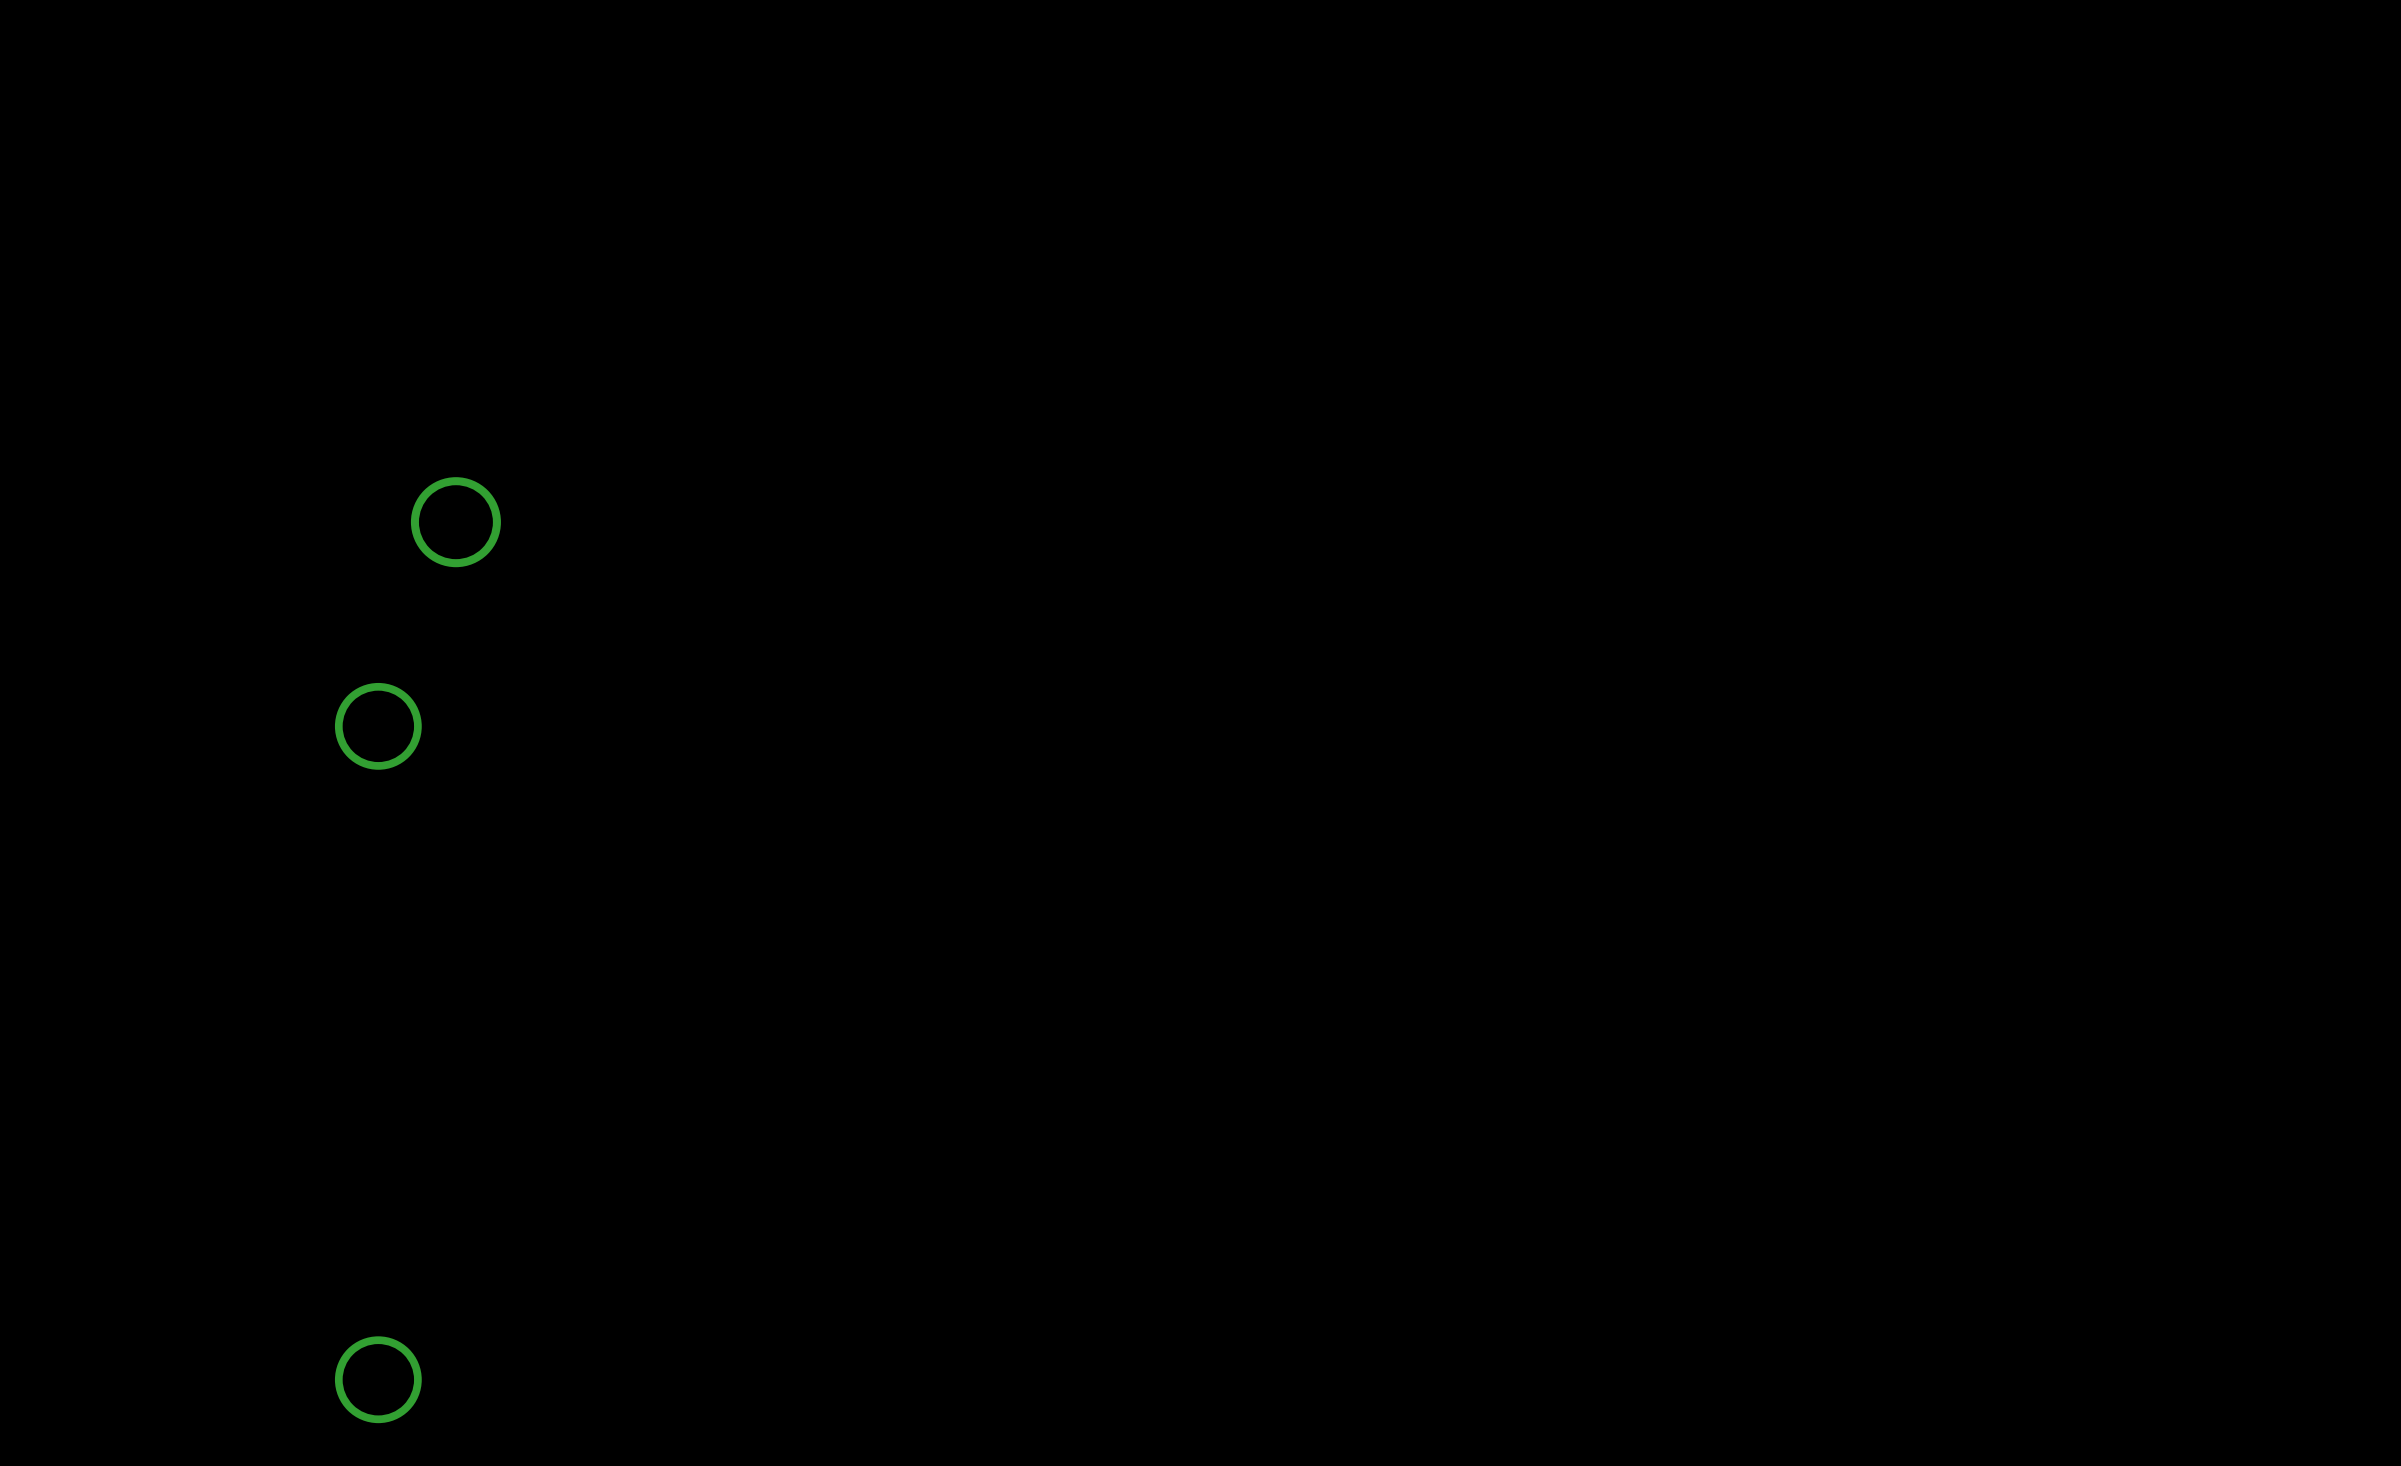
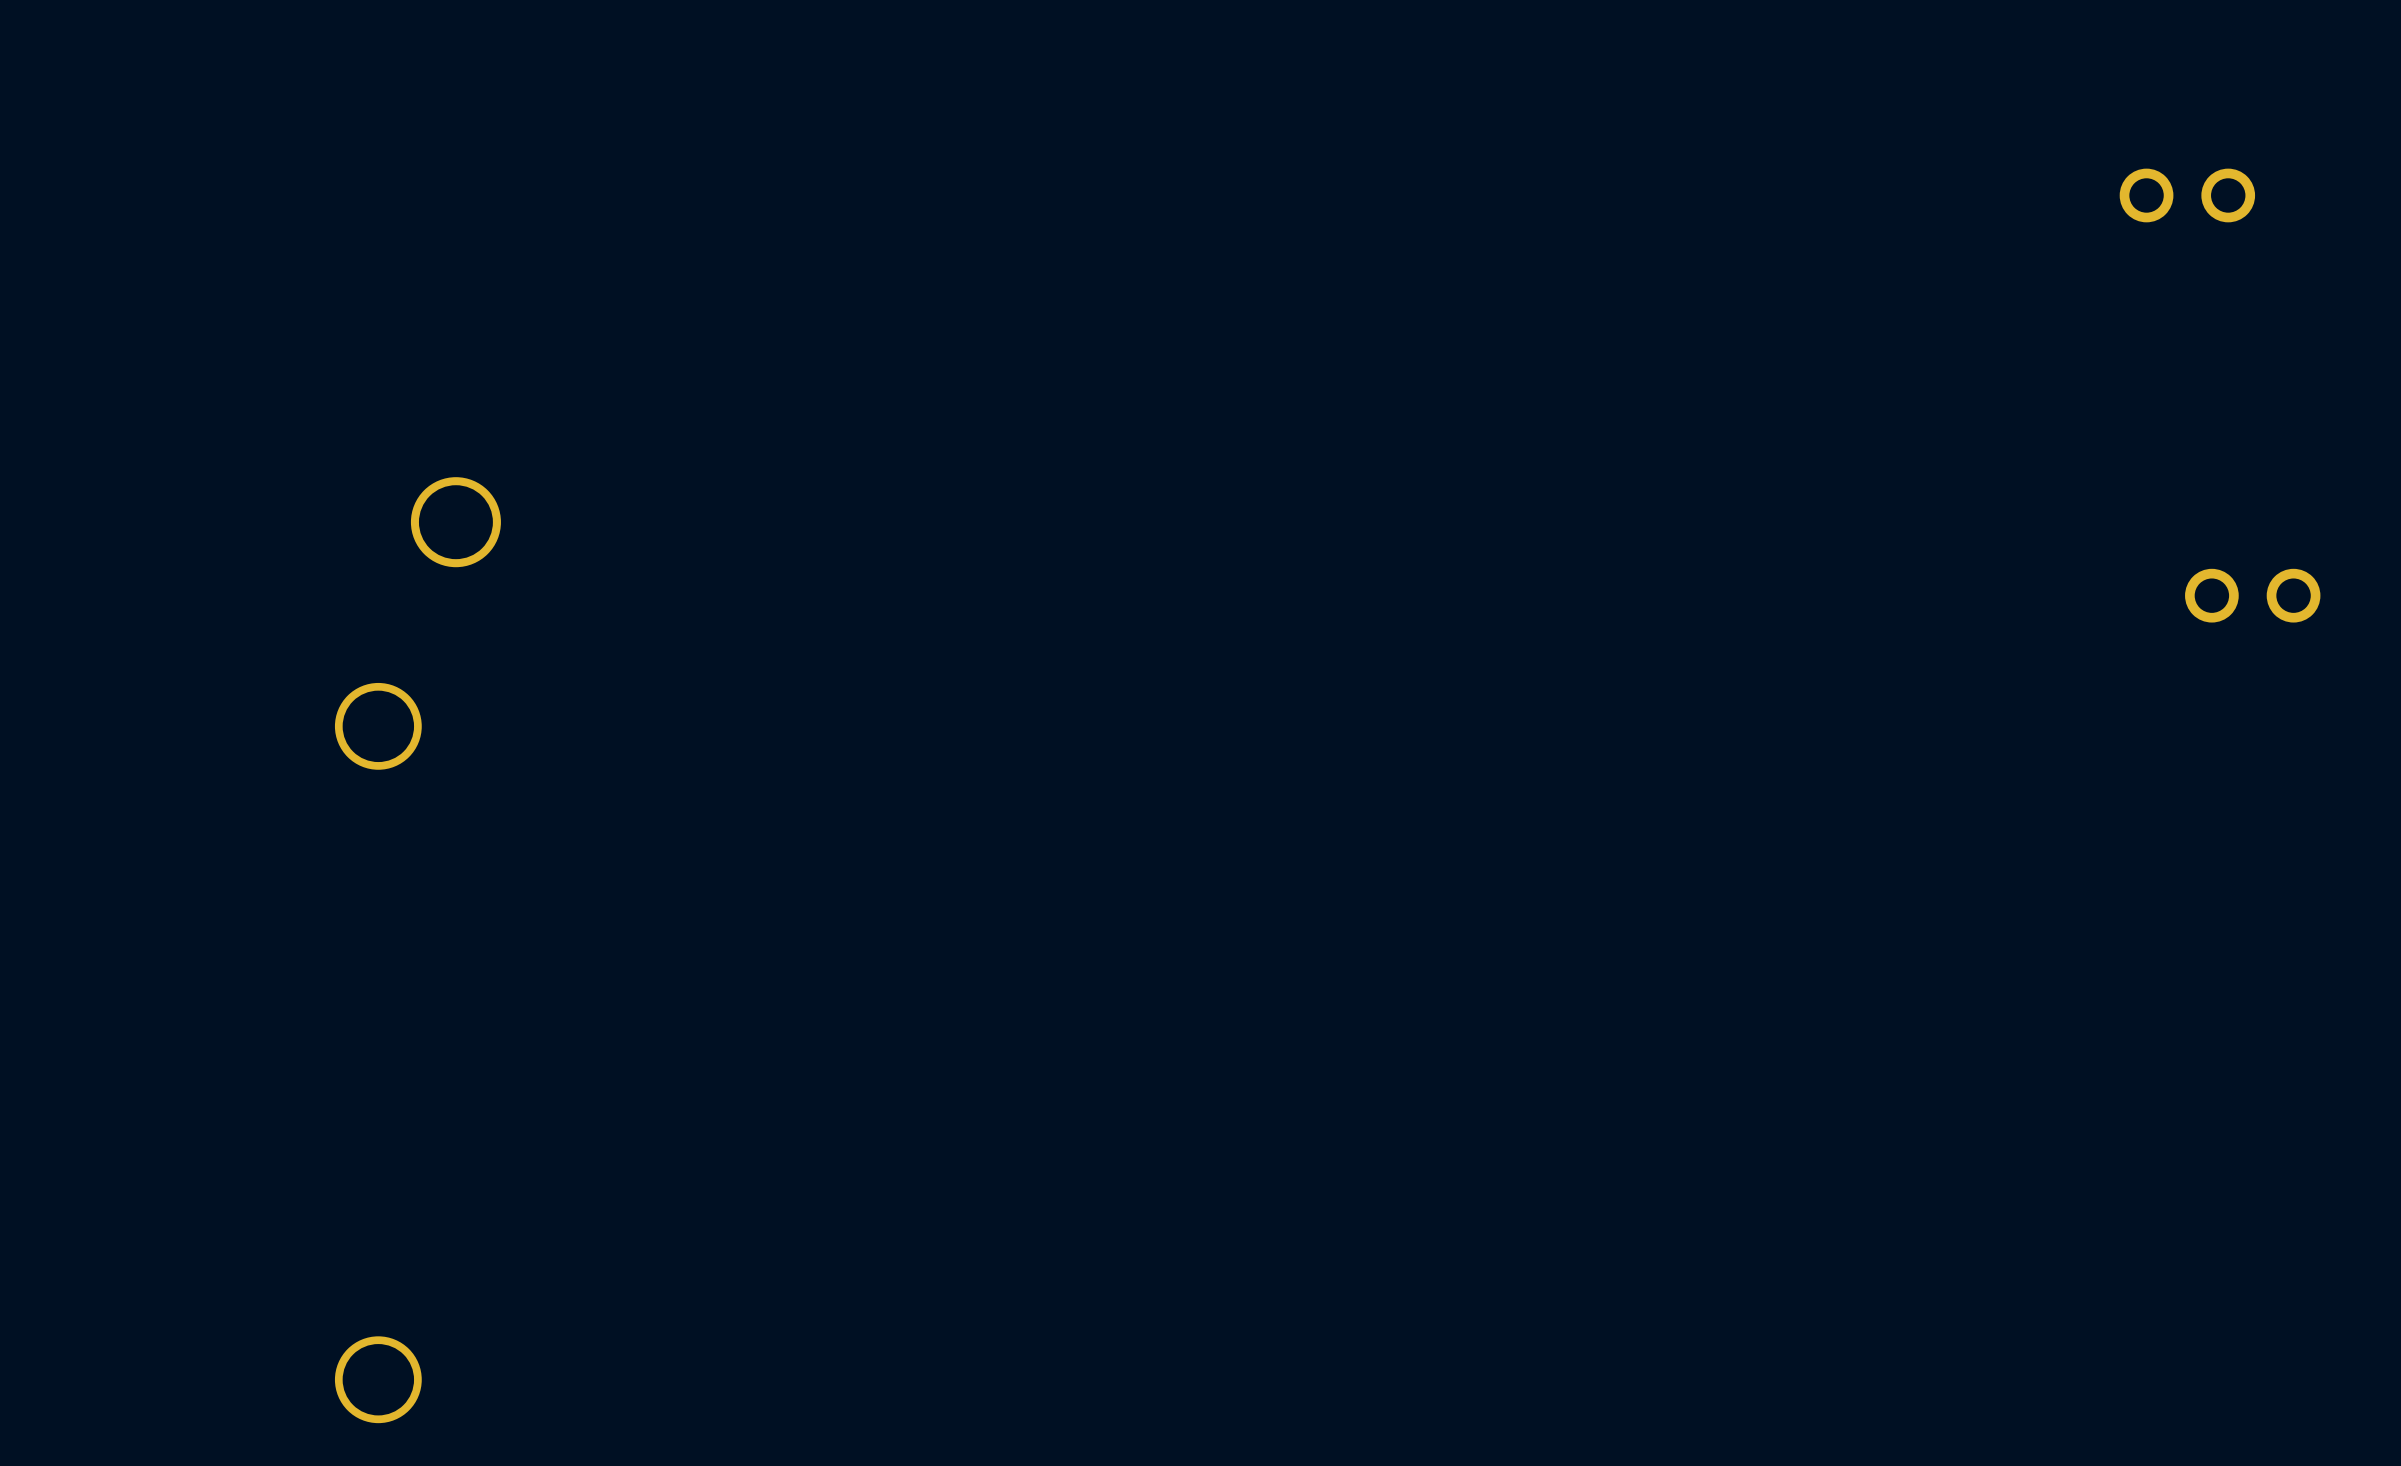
part: none -> (2187, 195)
part: none -> (2252, 595)

